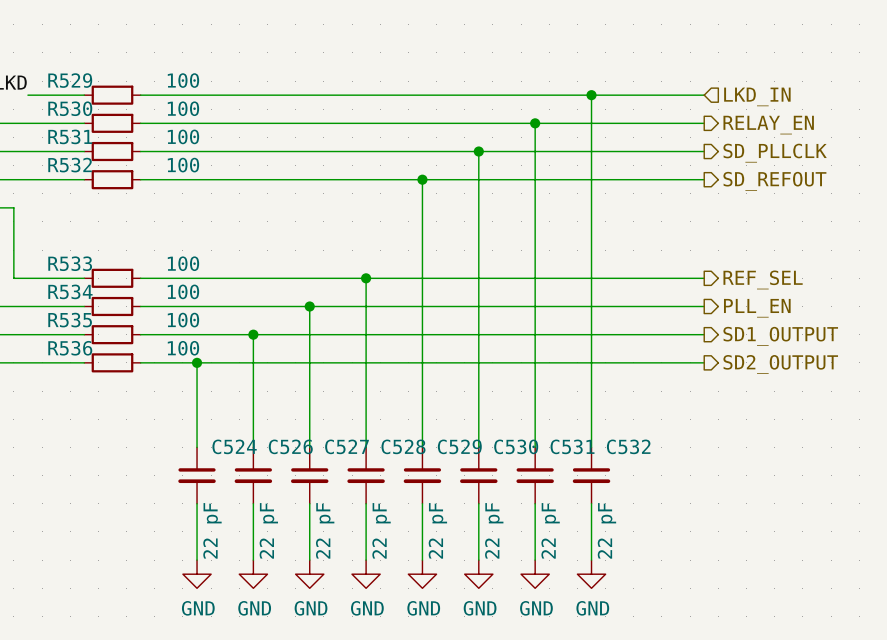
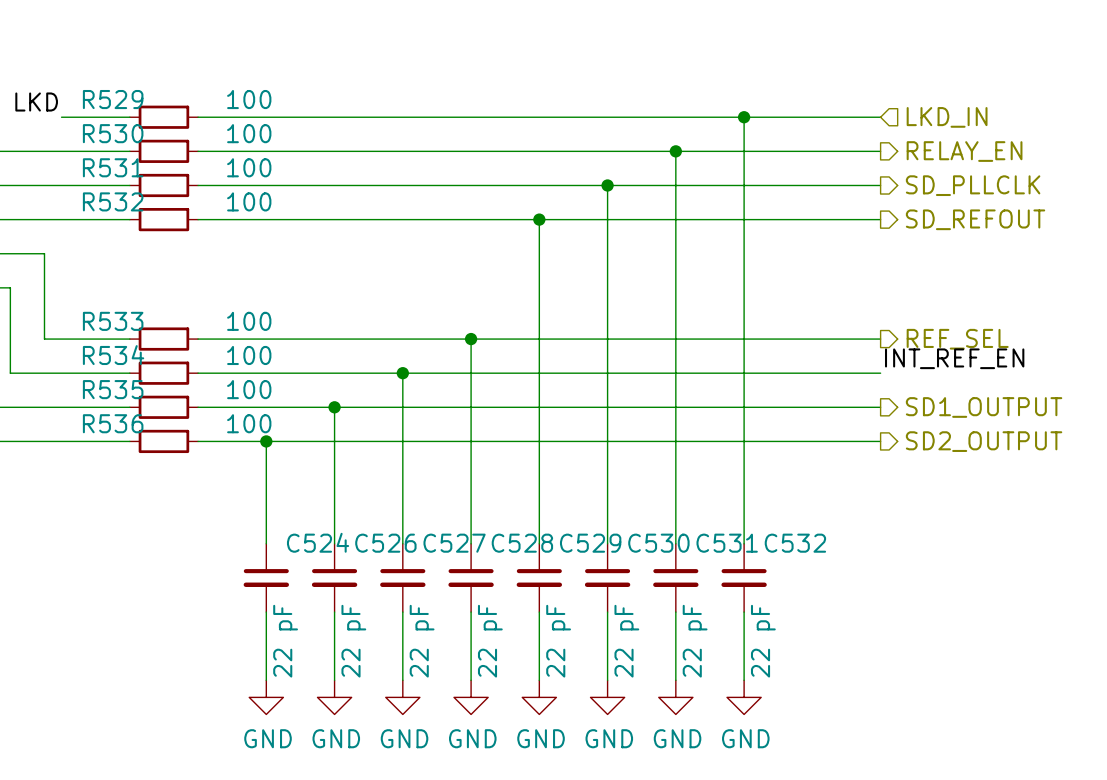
label: none -> INT_REF_EN (954, 358)
hierarchical label: PLL_EN (757, 308) -> none

